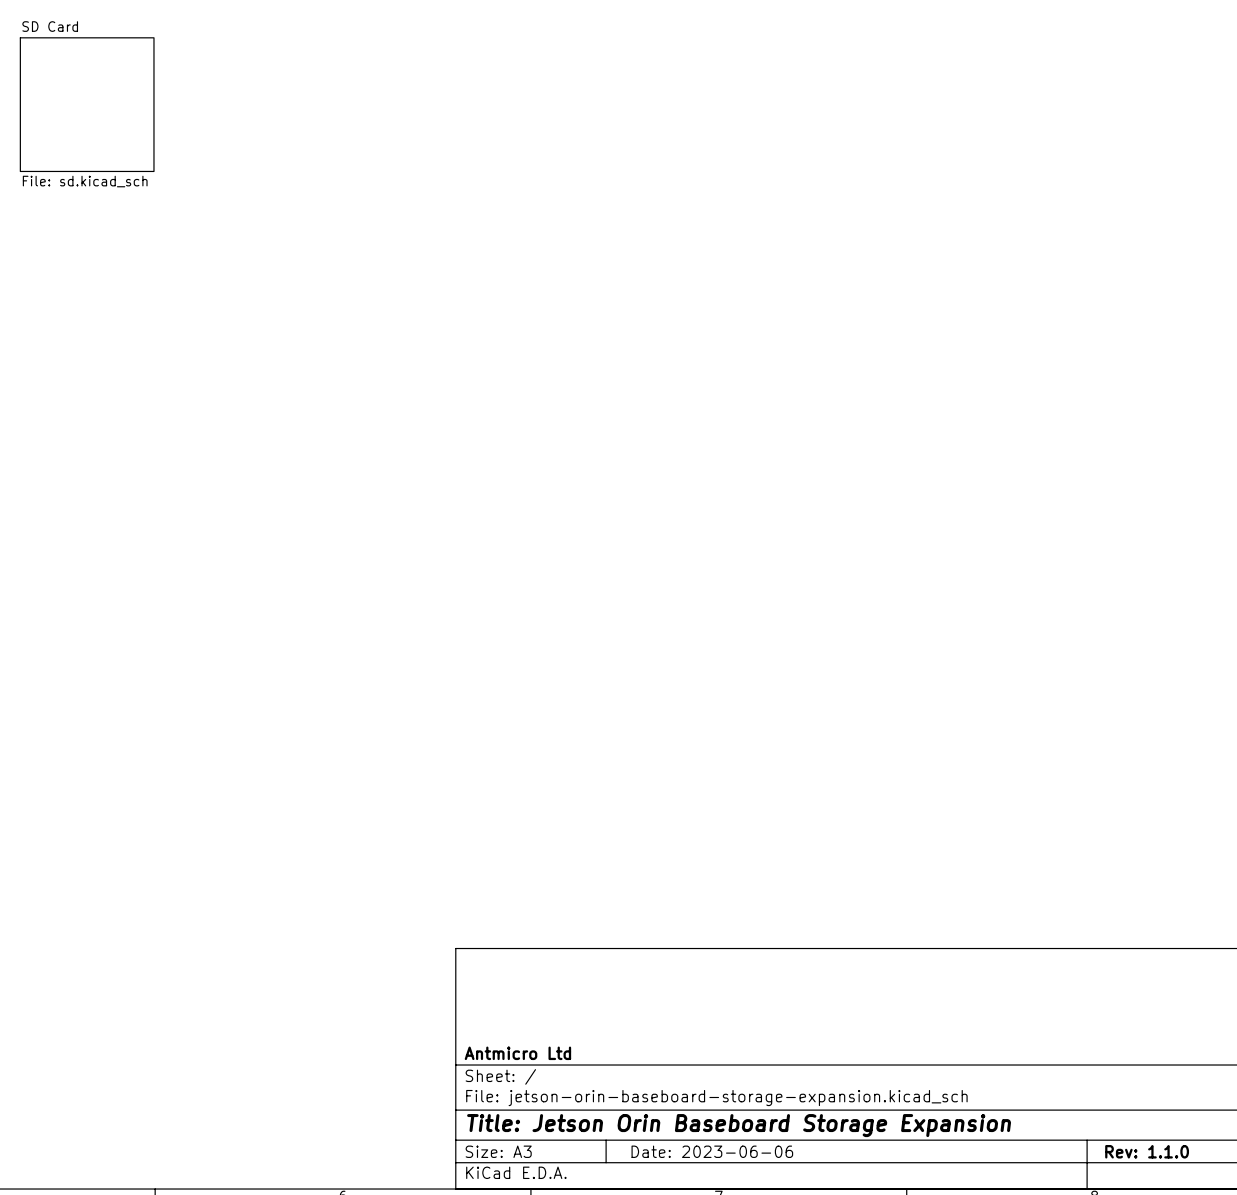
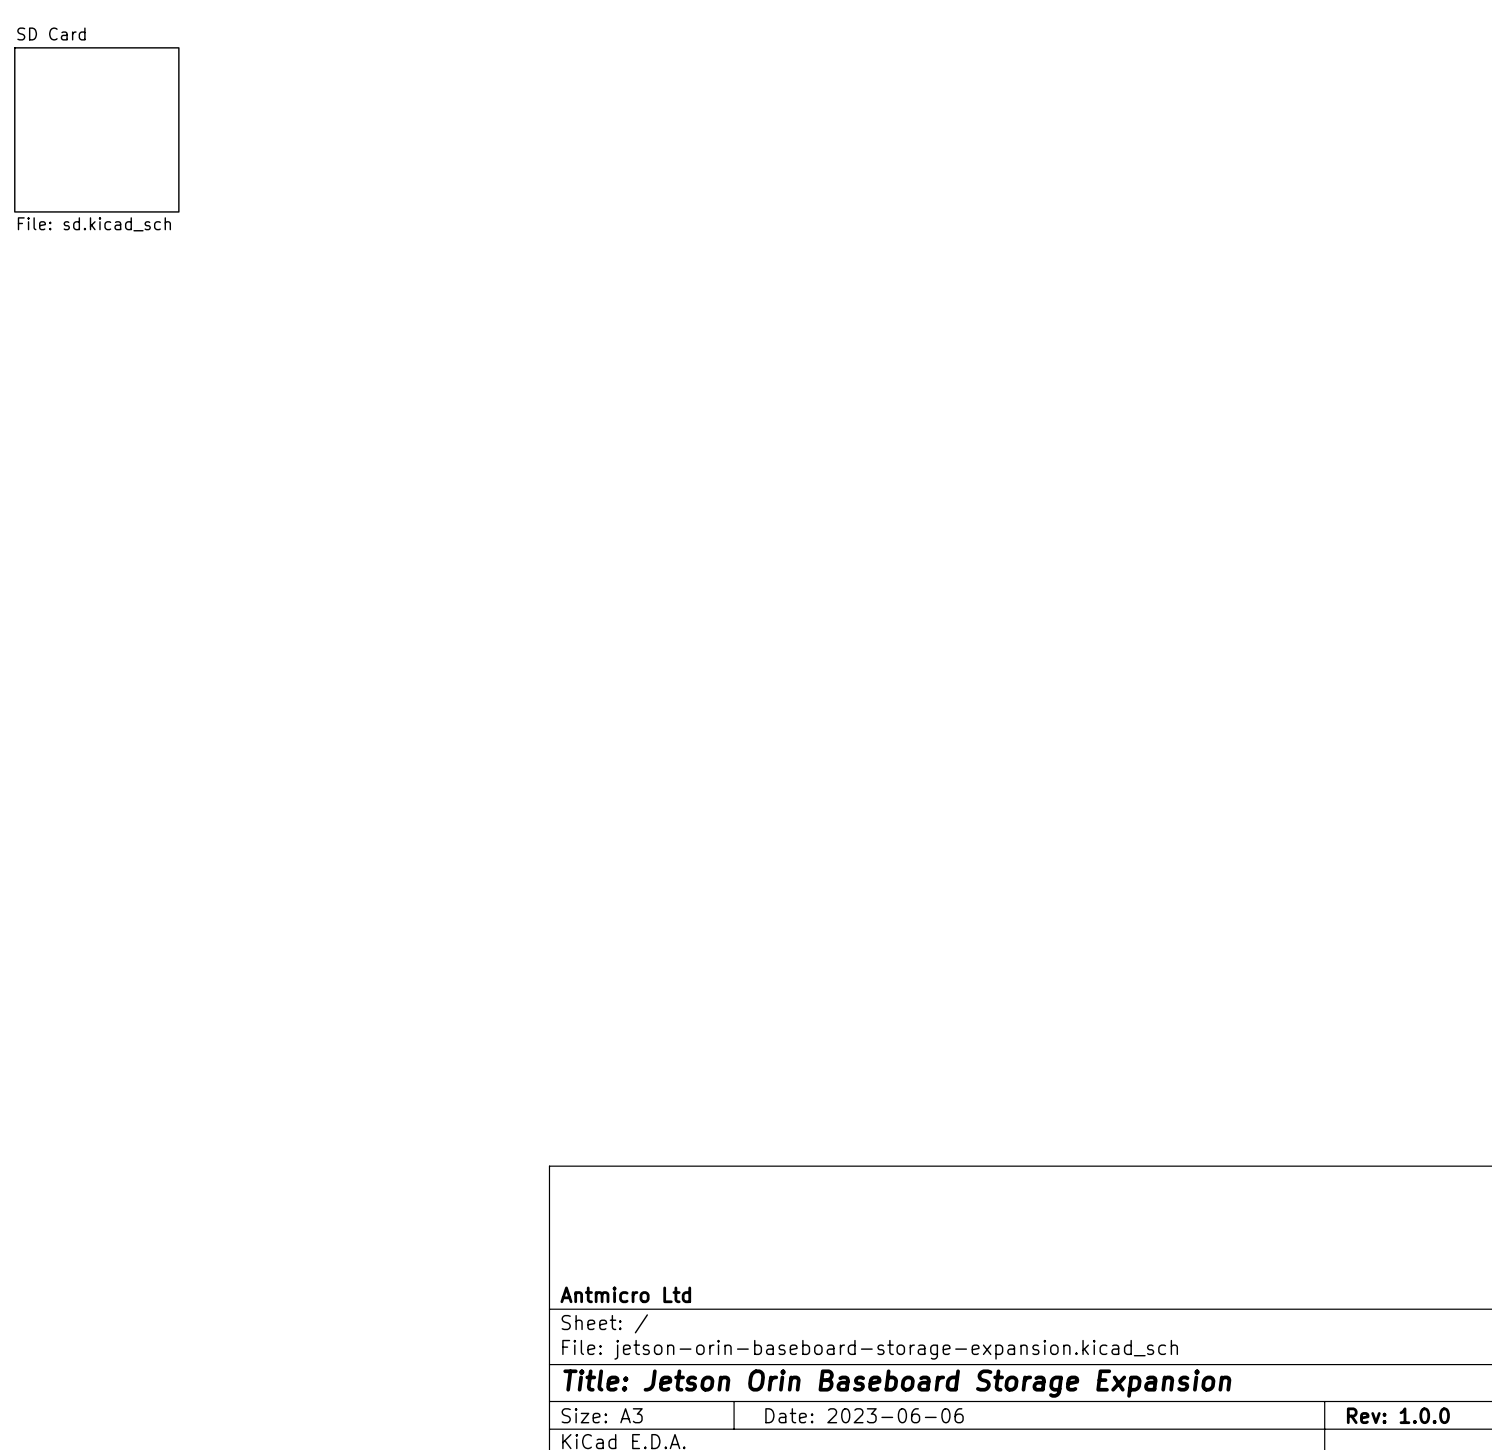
title block: Rev: 1.1.0 (1147, 1151) -> Rev: 1.0.0 (1398, 1415)

